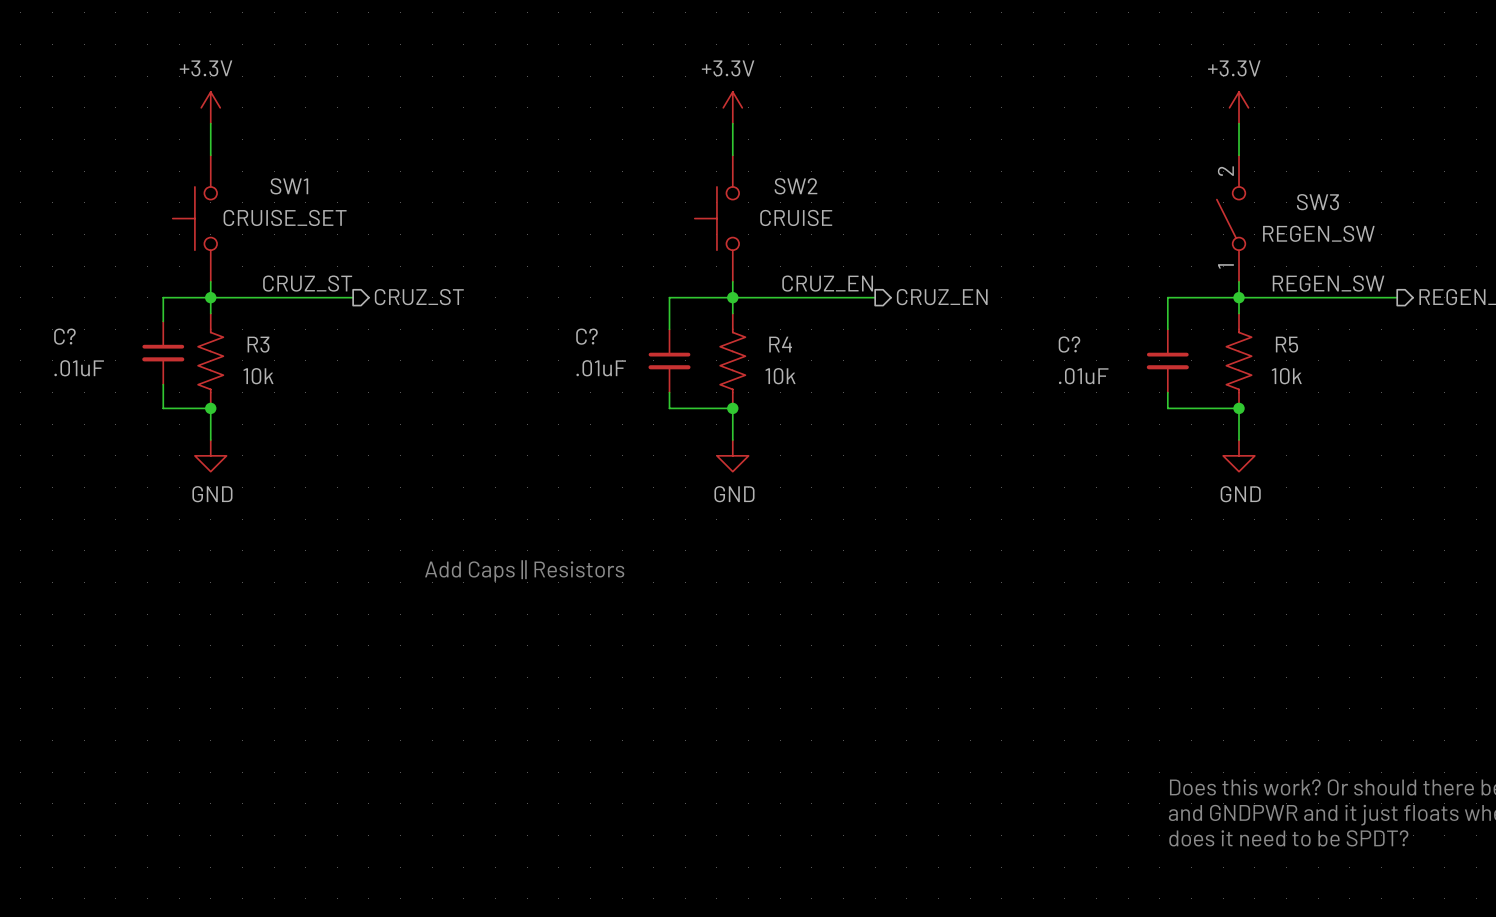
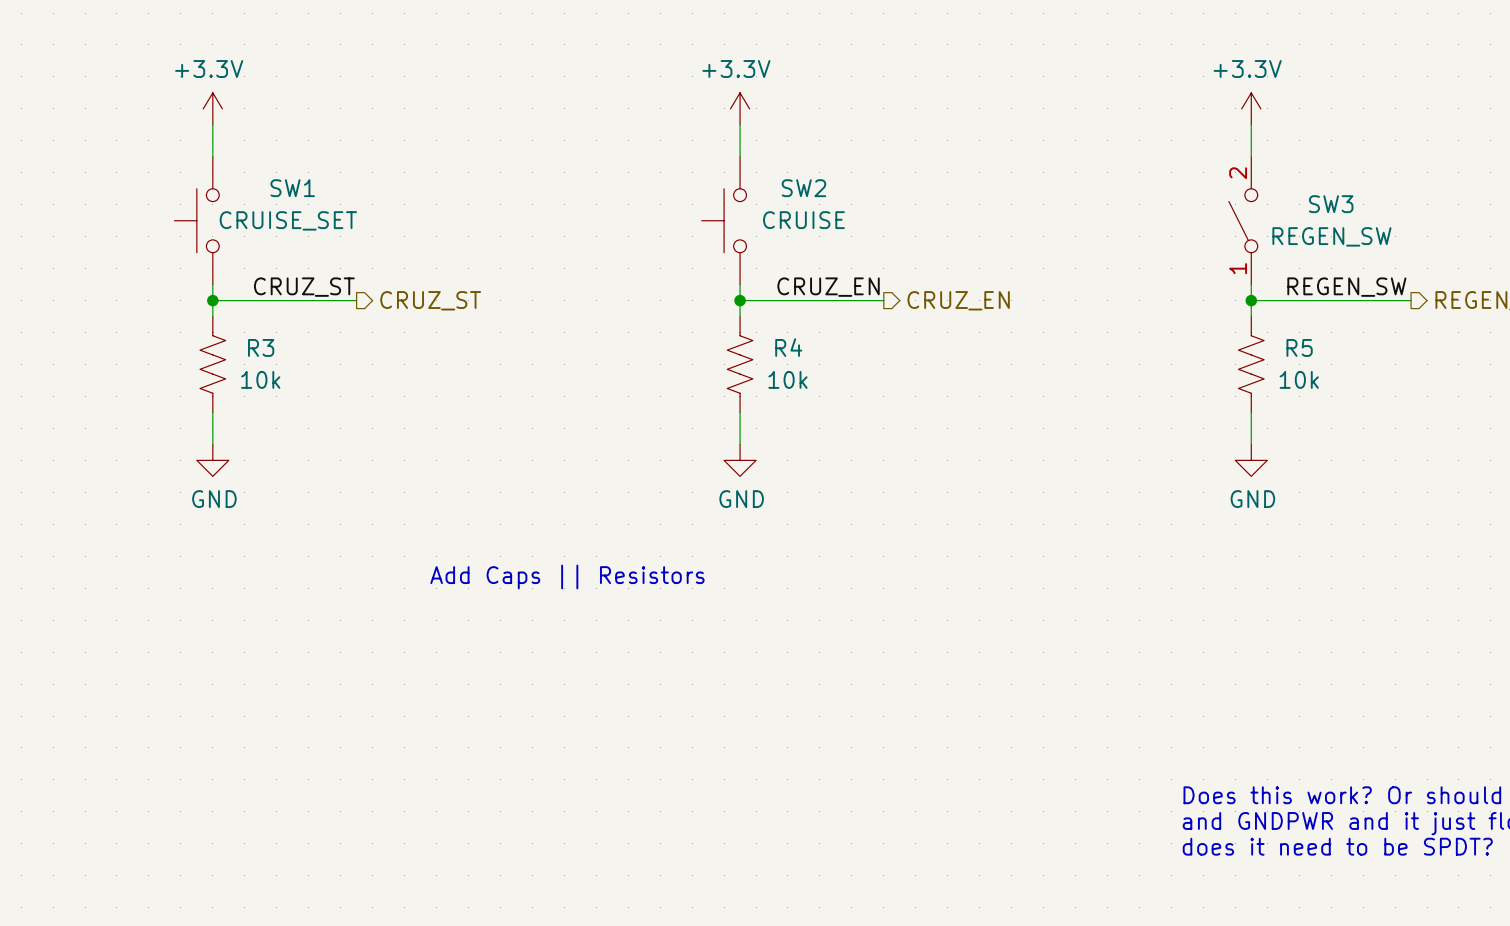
wire: (210, 297) (163, 297) (163, 321) -> none
wire: (732, 297) (669, 297) (669, 329) -> none
wire: (1239, 297) (1167, 297) (1167, 329) -> none
C?: .01uF (163, 353) -> none
C?: .01uF (669, 360) -> none
C?: .01uF (1167, 360) -> none
wire: (163, 384) (163, 408) (210, 408) -> none
wire: (669, 392) (669, 408) (732, 408) -> none
wire: (1167, 392) (1167, 408) (1239, 408) -> none
junction: (210, 408) -> none
junction: (732, 408) -> none
junction: (1239, 408) -> none

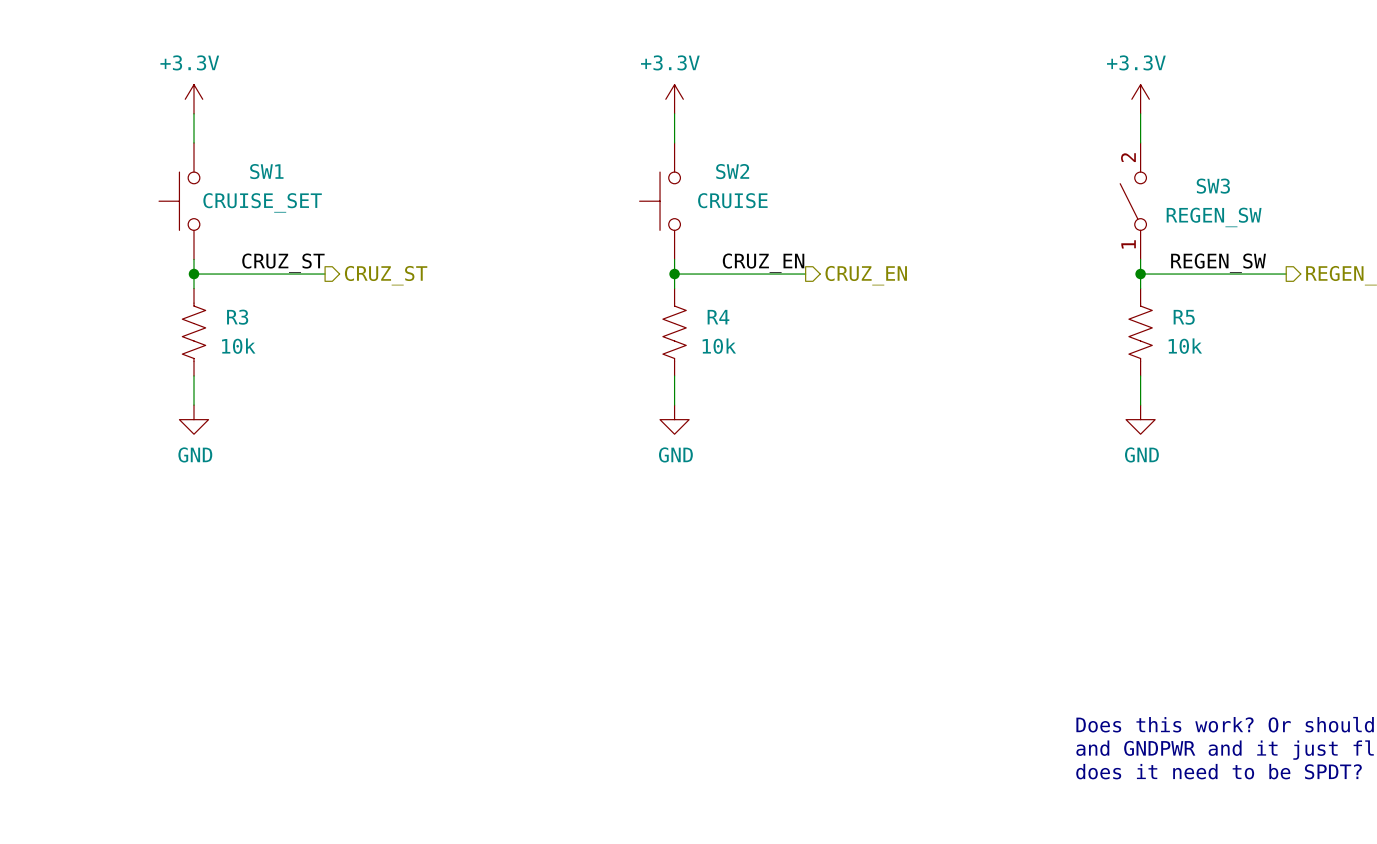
text: Add Caps || Resistors (567, 577) -> none

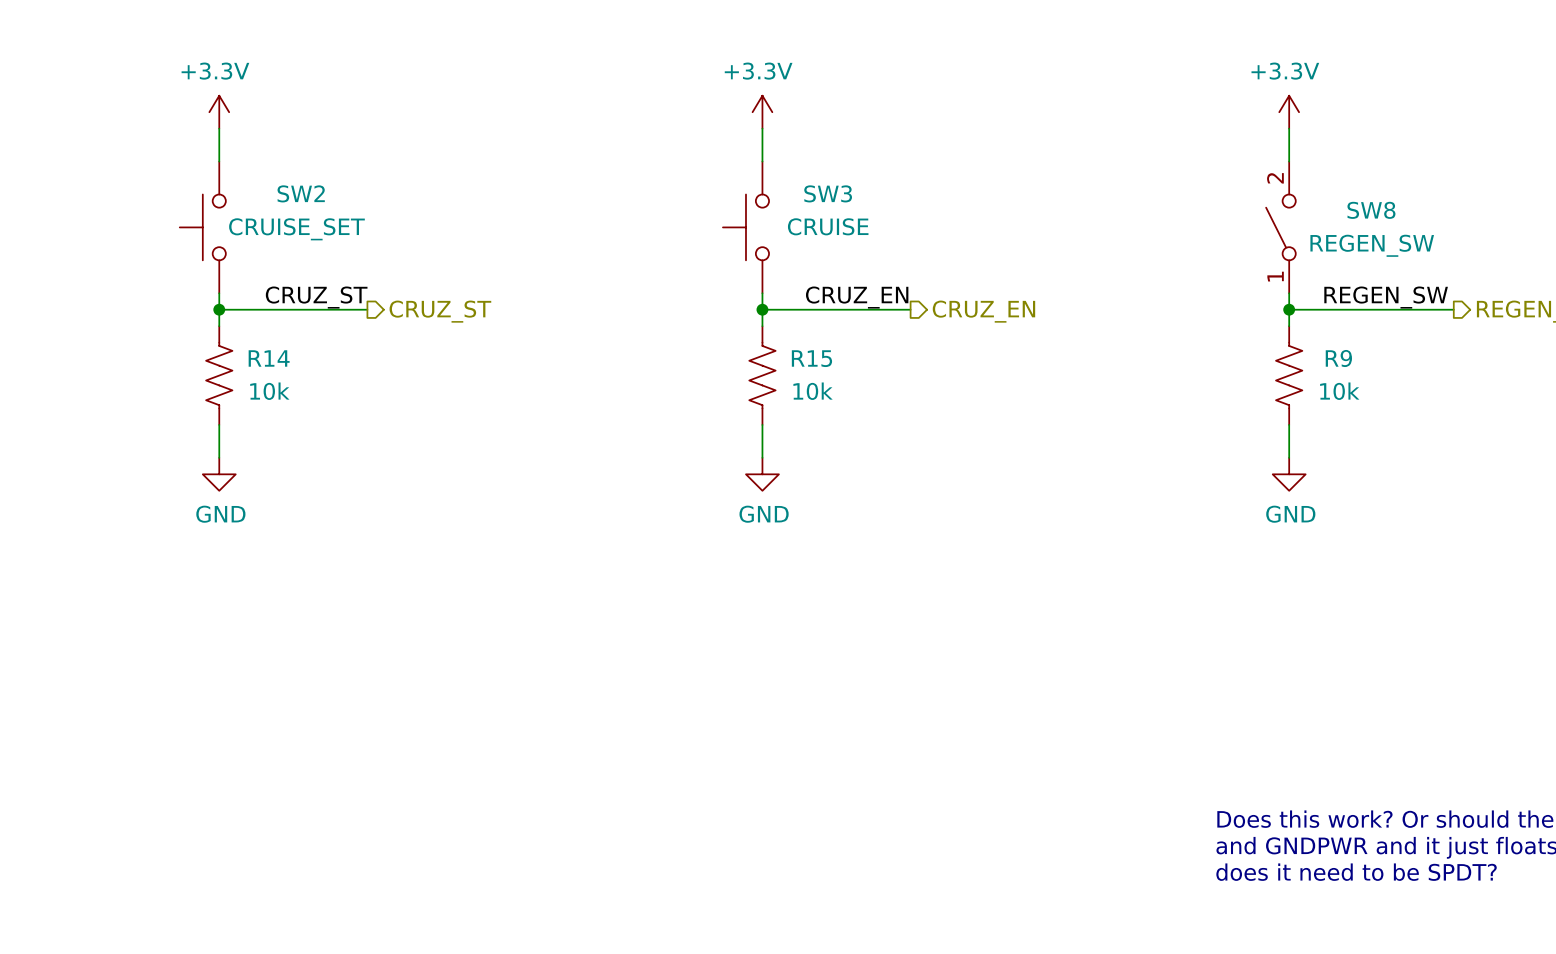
SW1 name: SW1 (266, 171) -> SW2 (301, 193)
SW2 name: SW2 (732, 171) -> SW3 (828, 193)
SW3 name: SW3 (1213, 186) -> SW8 (1371, 210)
R3 name: R3 (237, 317) -> R14 (269, 358)
R4 name: R4 (718, 317) -> R15 (811, 358)
R5 name: R5 (1184, 317) -> R9 (1338, 358)

